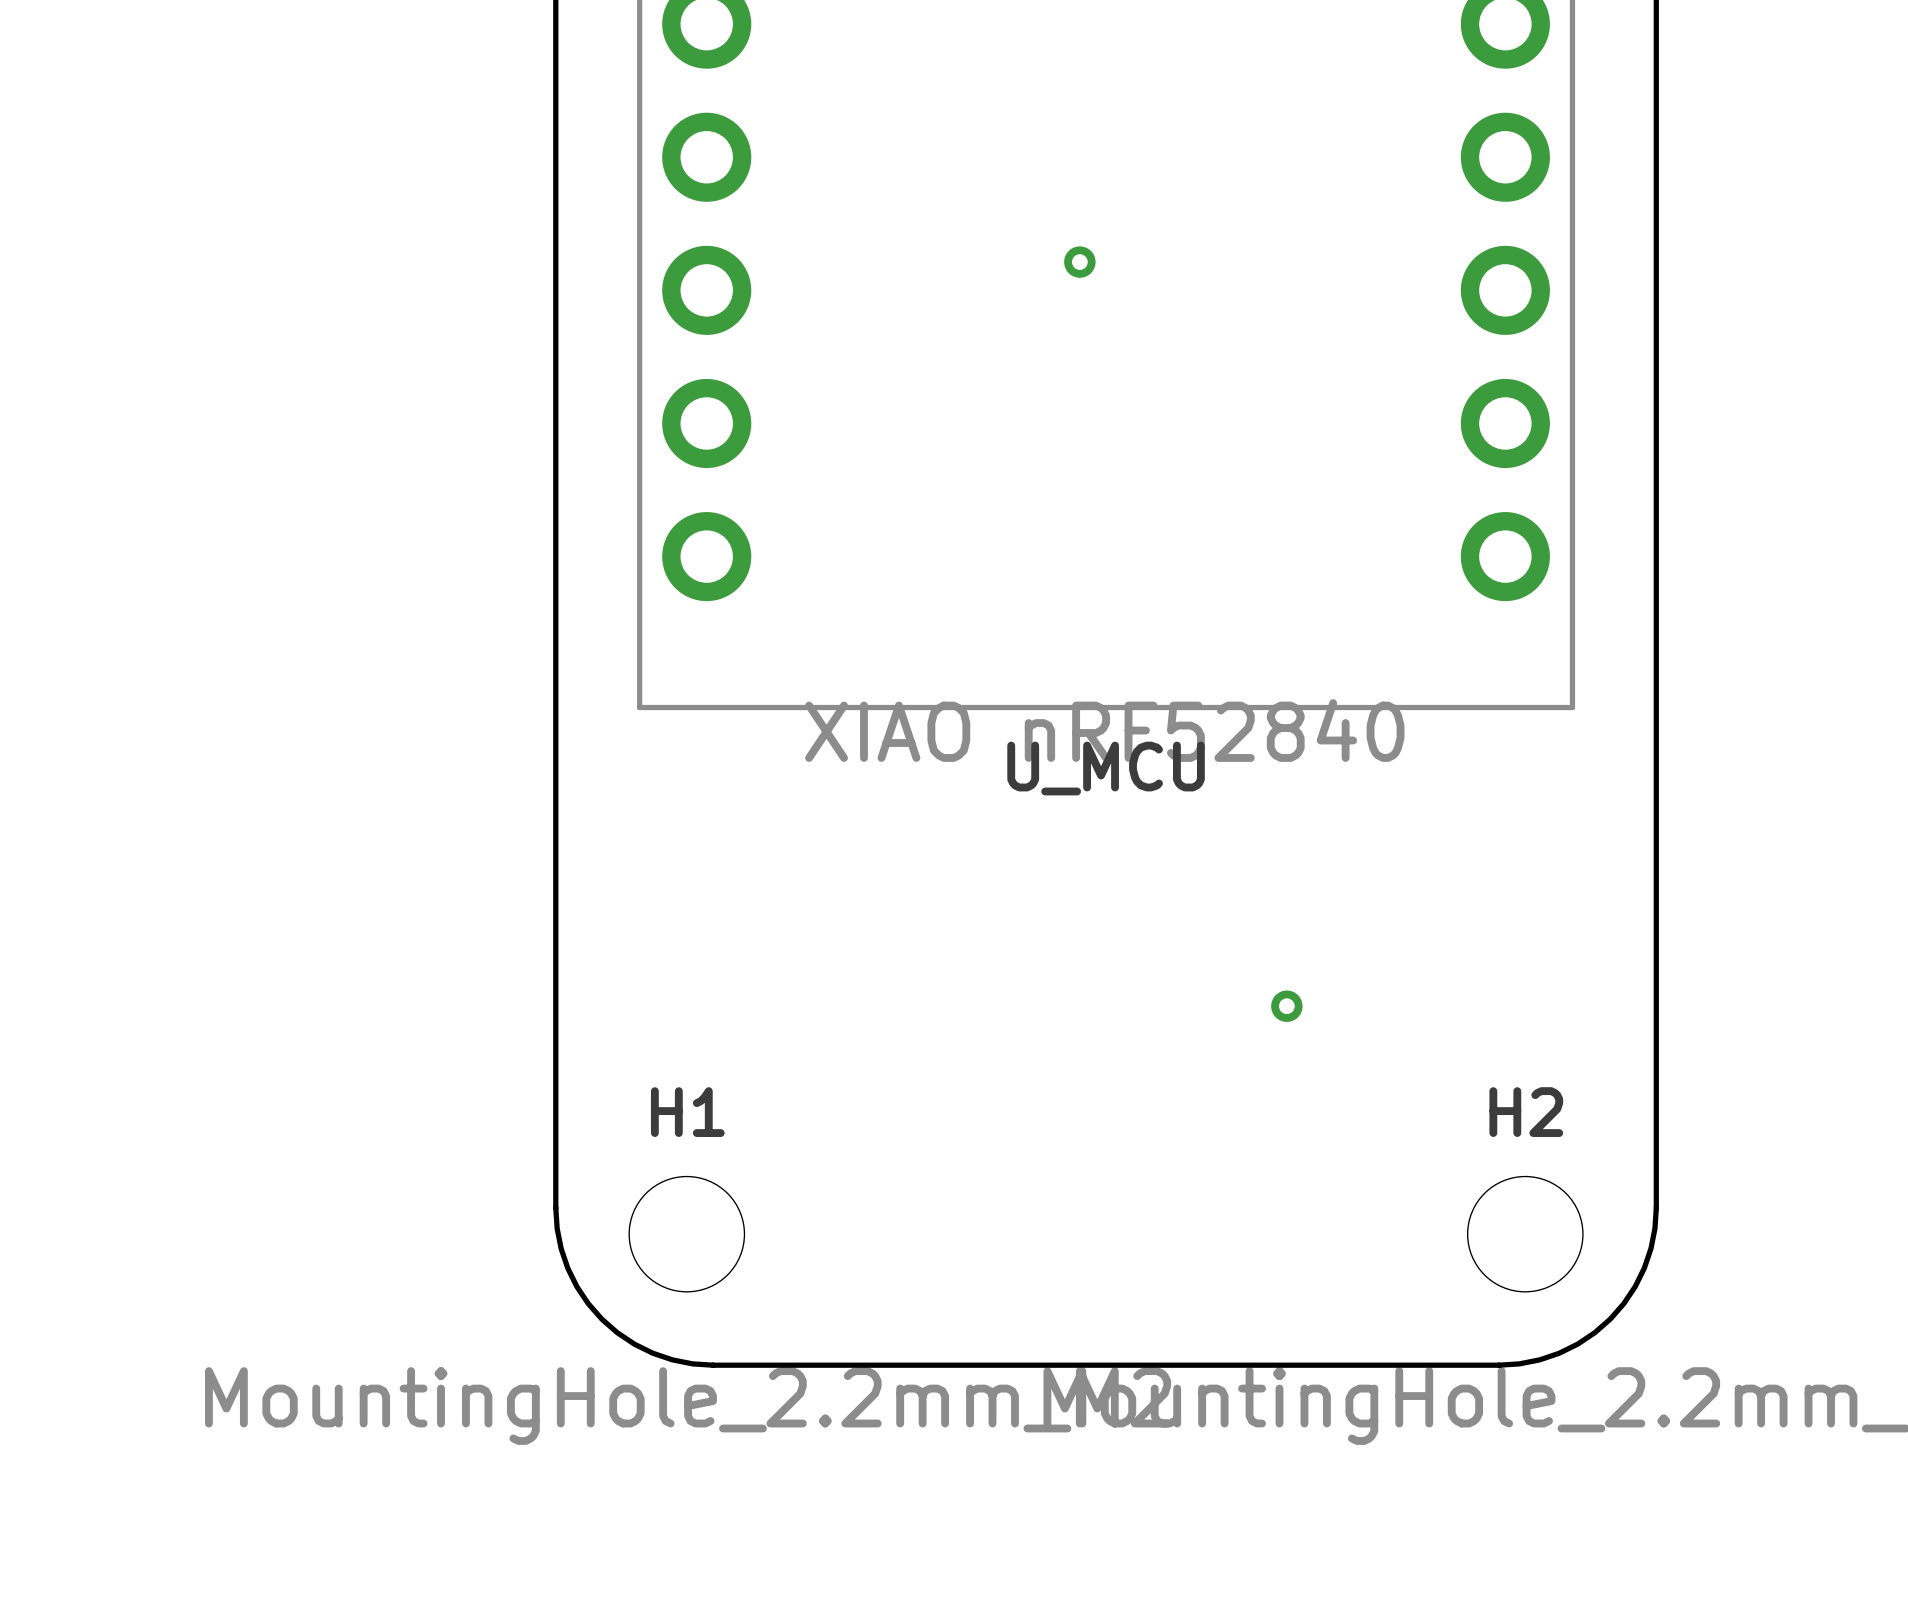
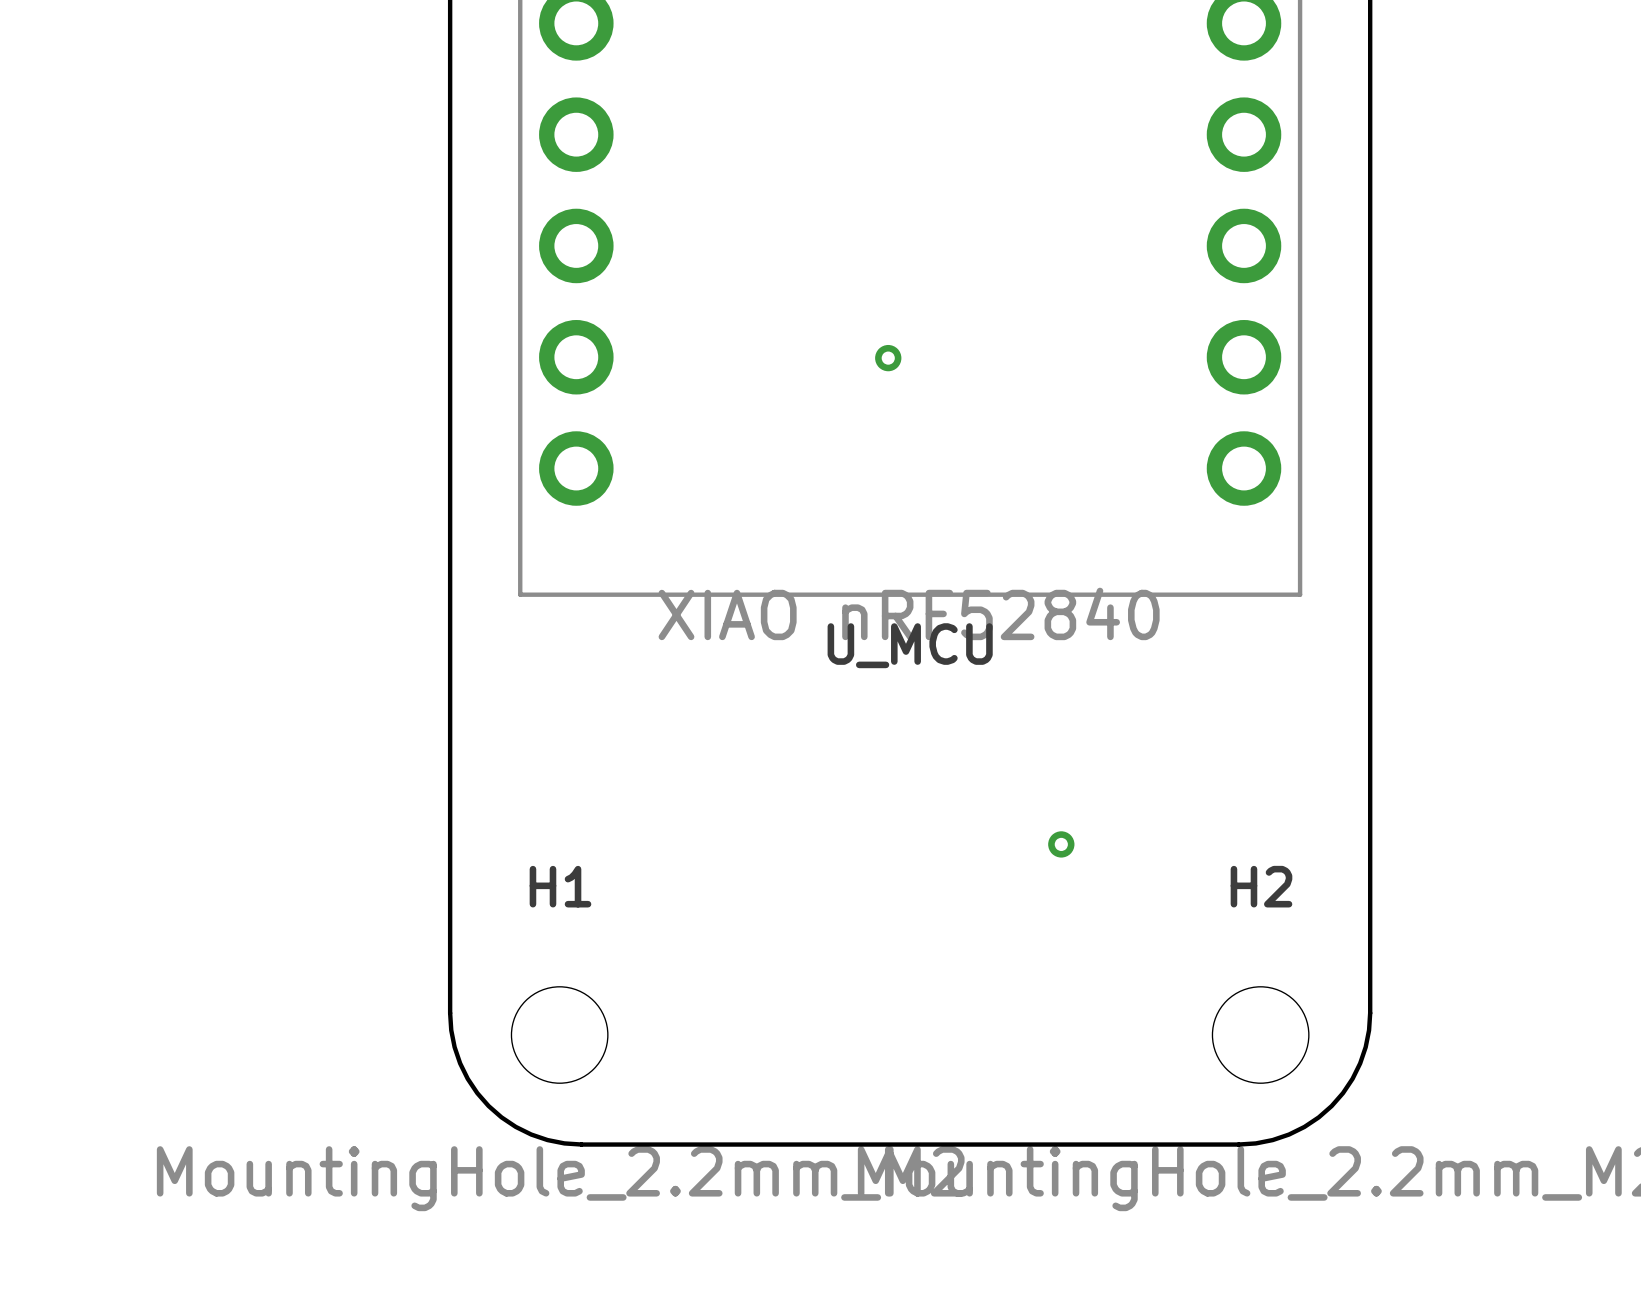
via position: (1079, 262) -> (888, 358)
H1 name position: H1 (687, 1112) -> H1 (560, 886)
H2 name position: H2 (1526, 1112) -> H2 (1261, 886)

